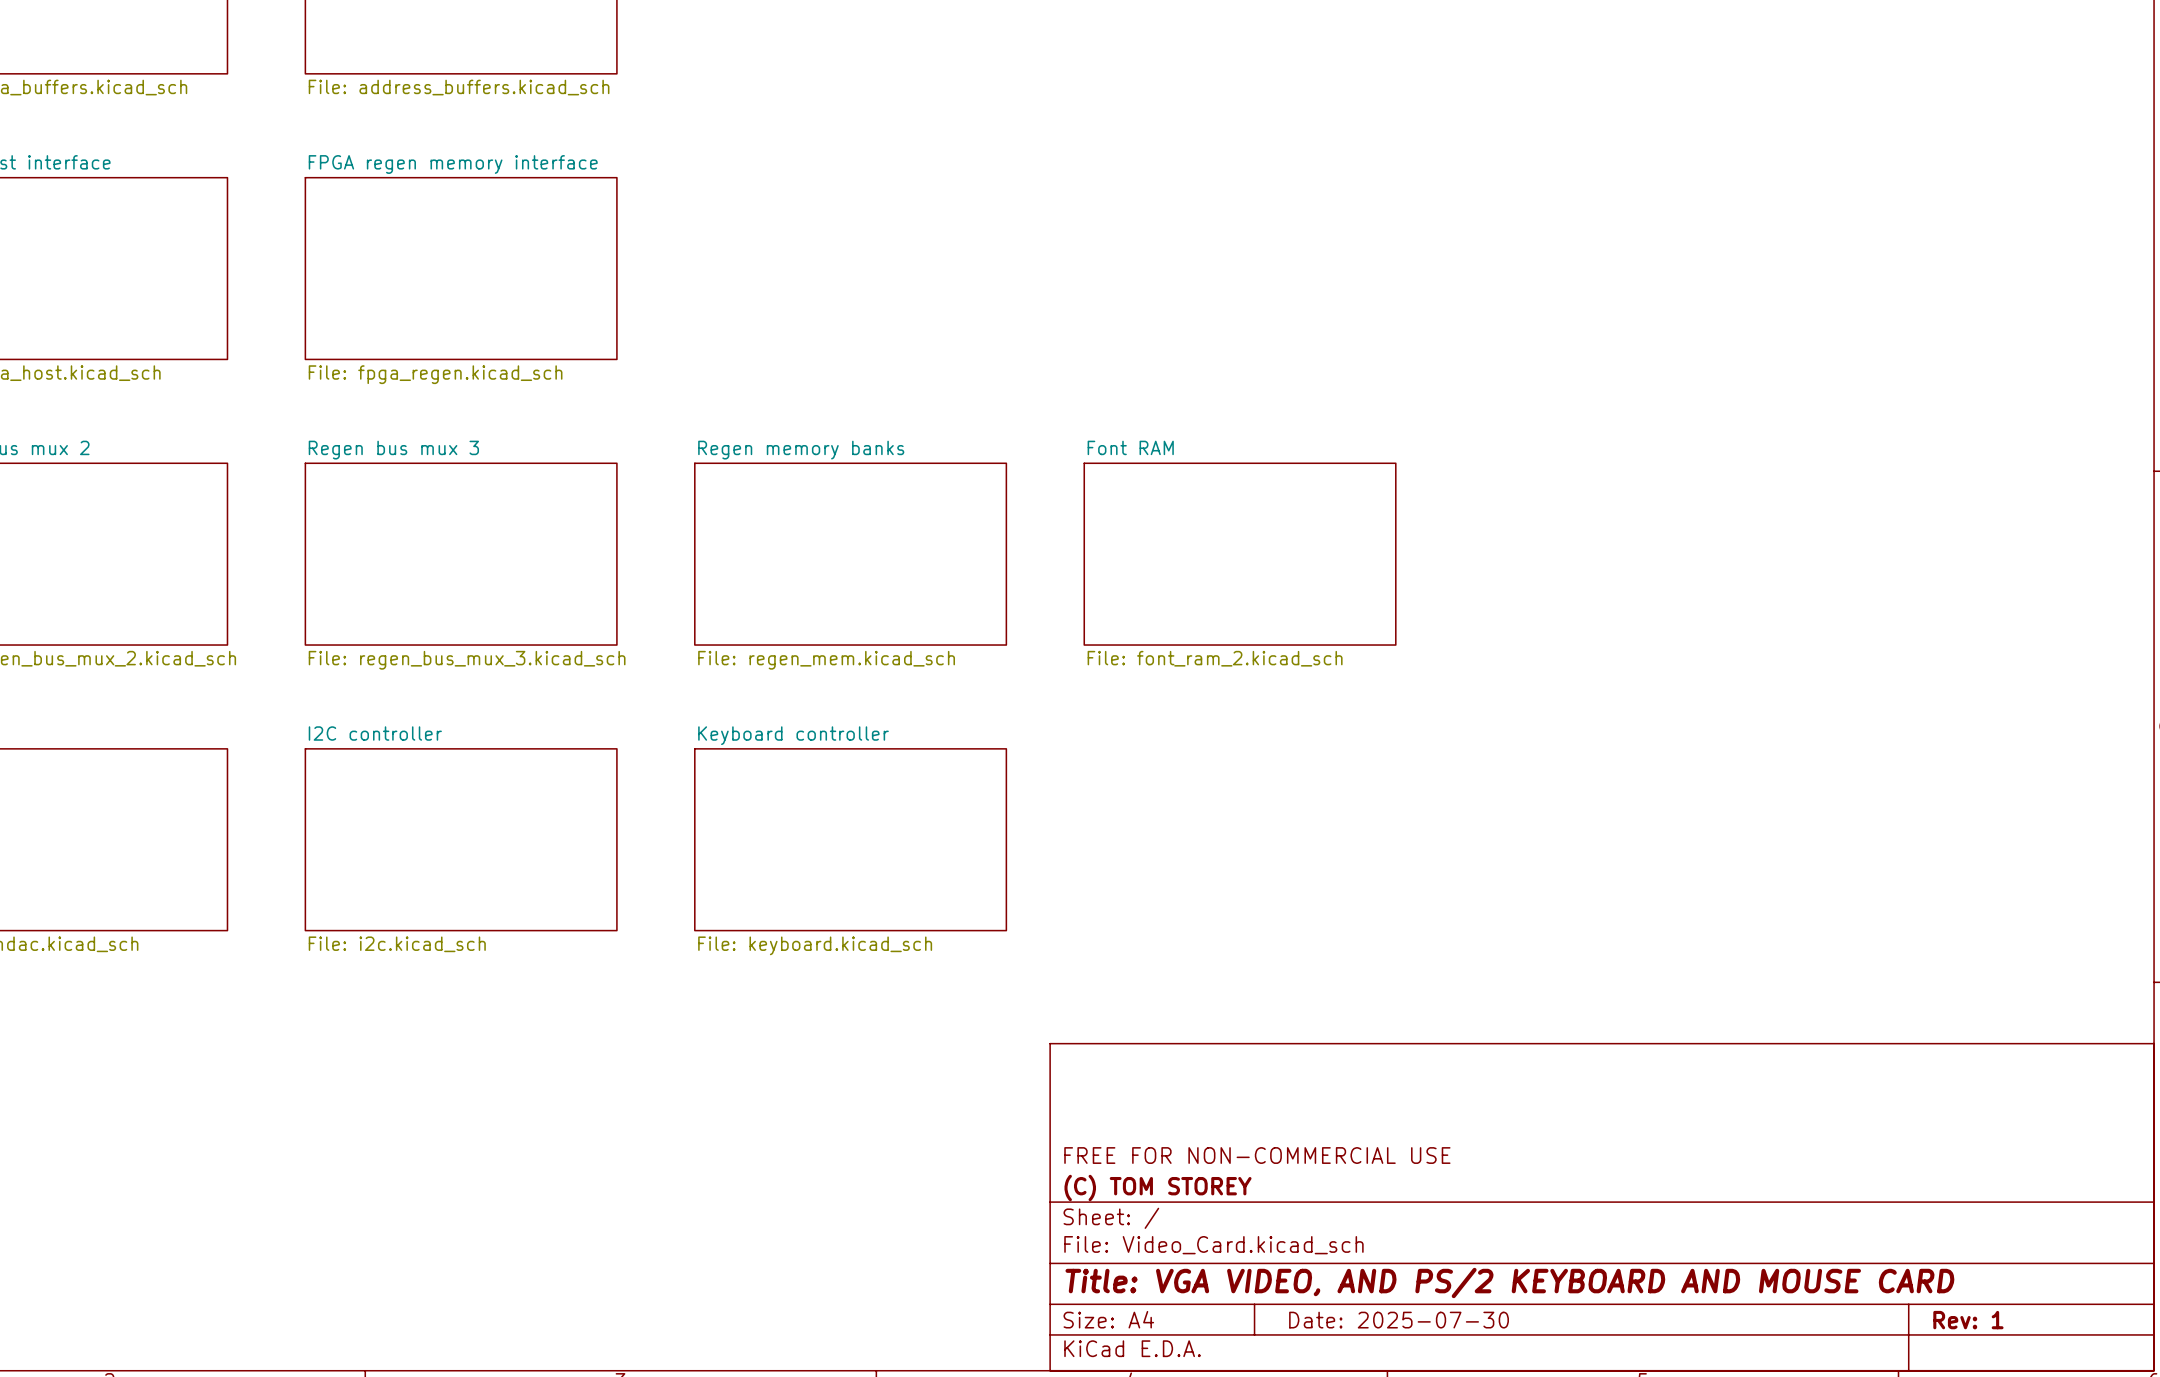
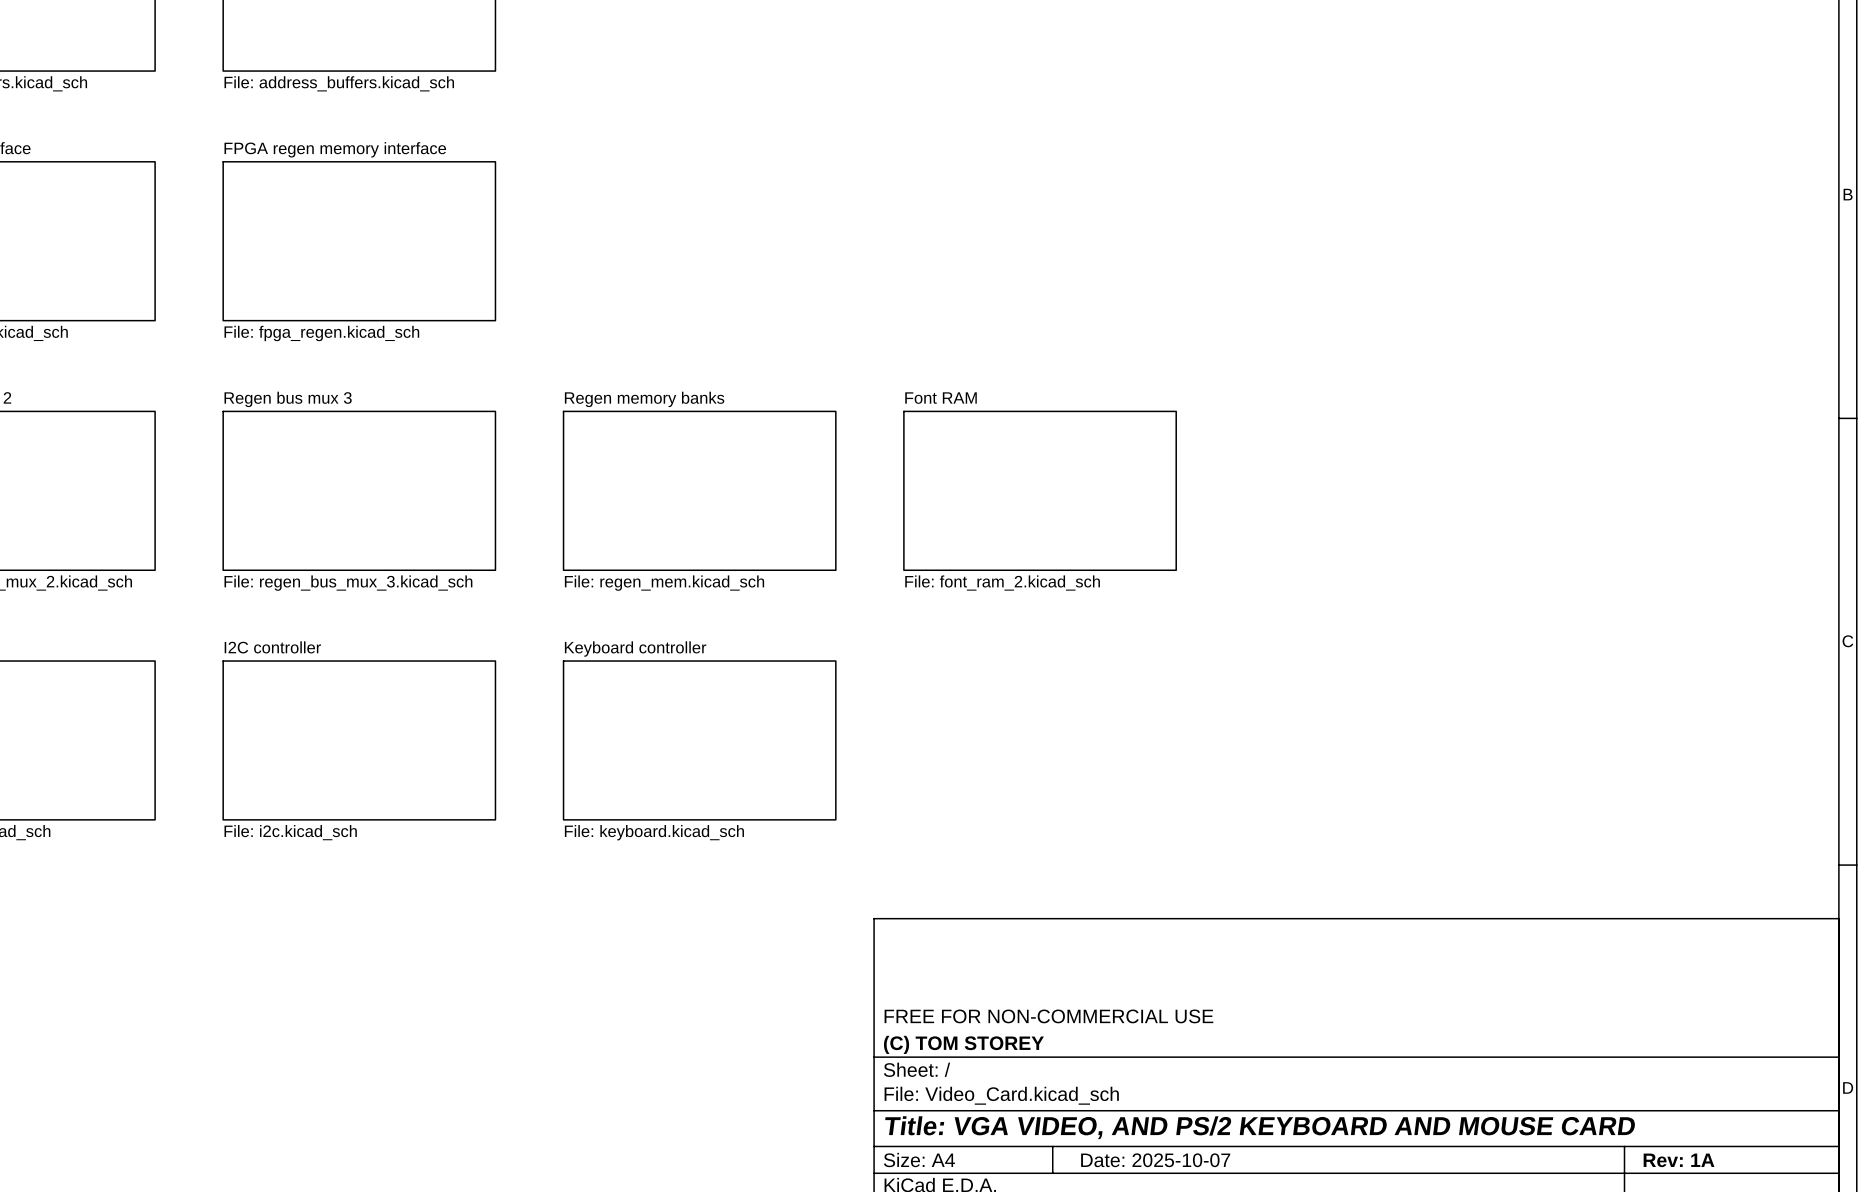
title block: Date: 2025-07-30 (1399, 1320) -> Date: 2025-10-07 (1155, 1160)
title block: Rev: 1 (1968, 1320) -> Rev: 1A (1679, 1160)

